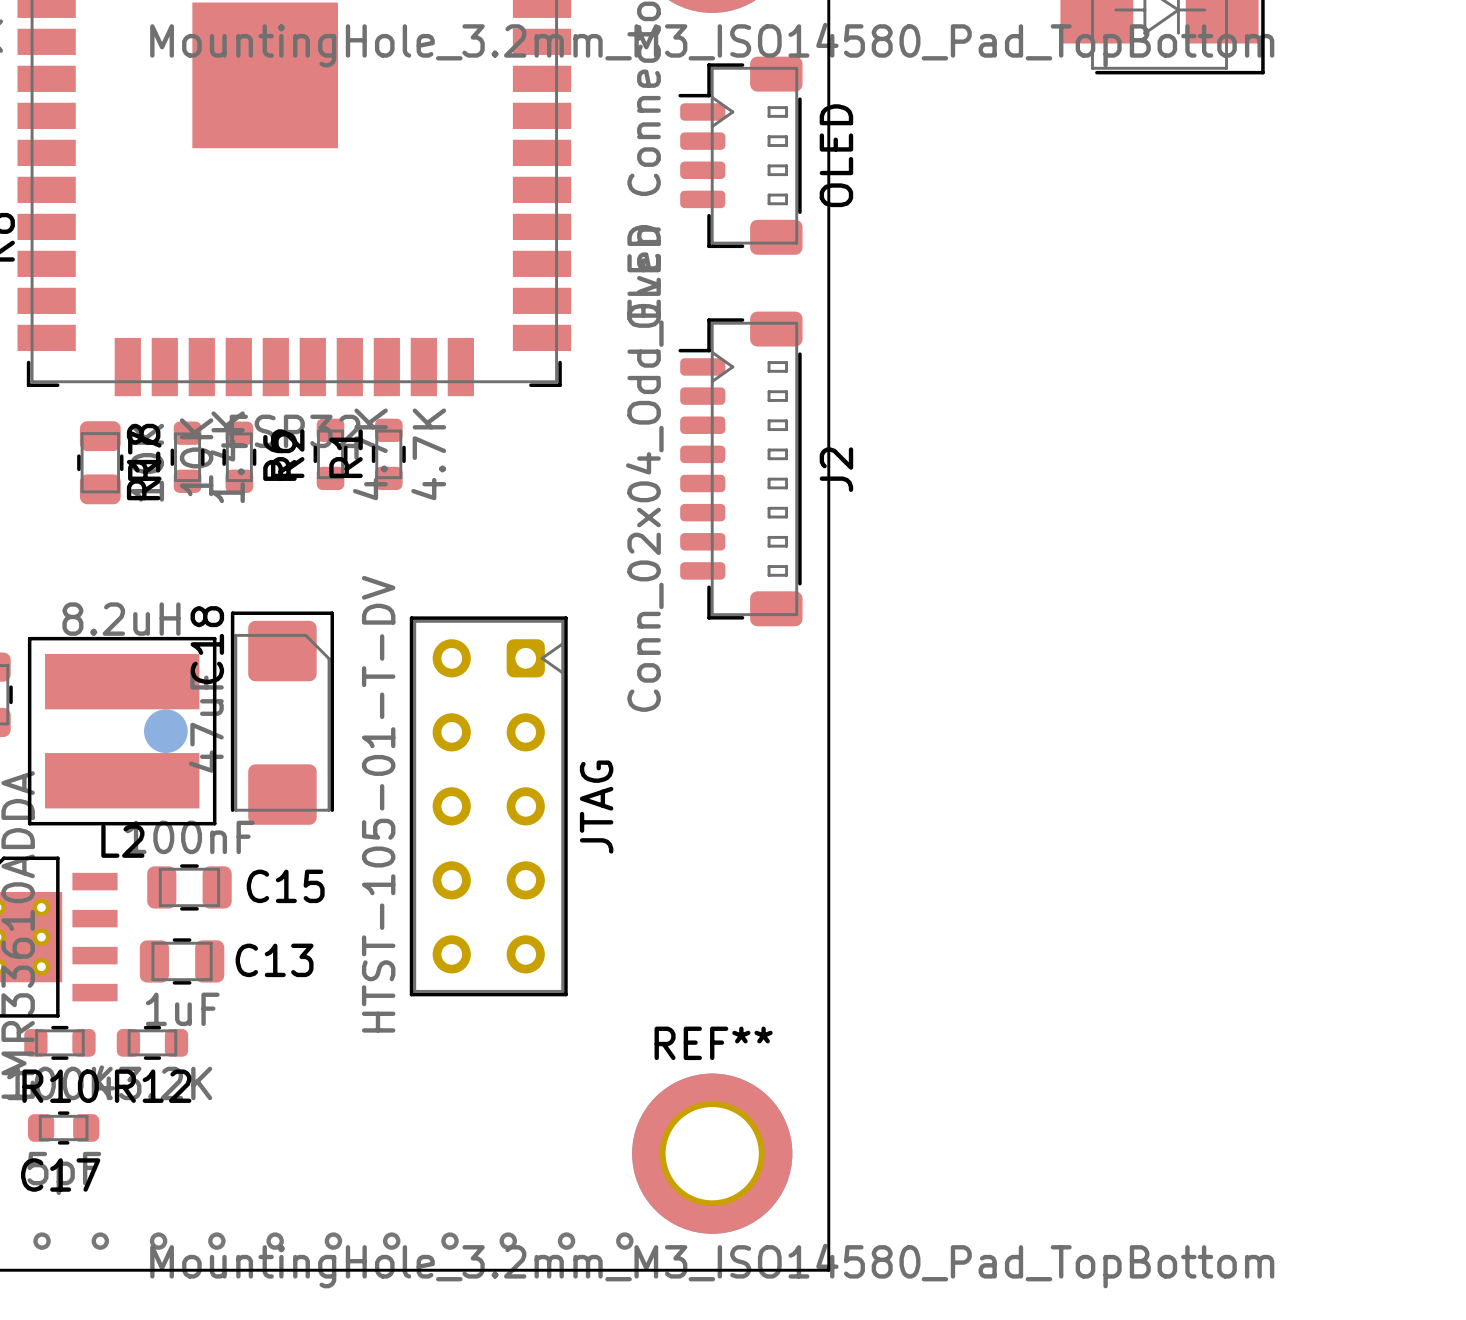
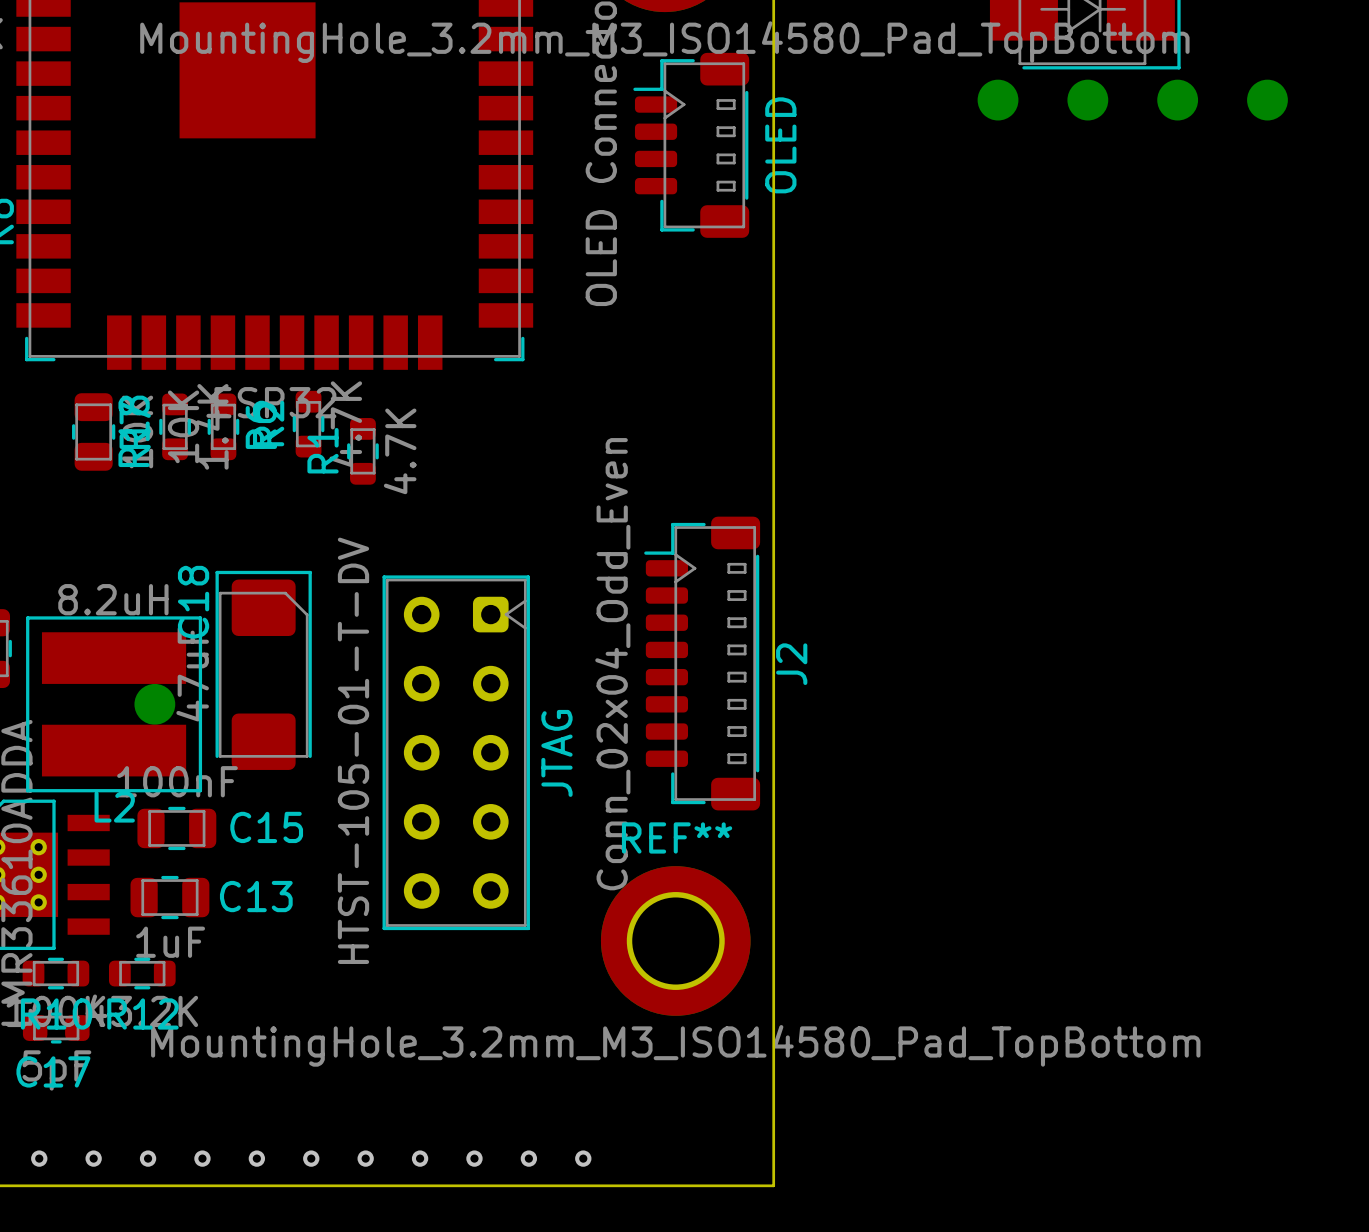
part: none -> (998, 100)
part: none -> (1087, 100)
part: none -> (1177, 100)
part: none -> (1267, 100)
R1 position: (388, 454) -> (362, 451)
J2 position: (740, 468) -> (702, 663)
L2 position: (122, 731) -> (114, 704)
part position: (165, 731) -> (154, 704)
C17 position: (63, 1127) -> (56, 1028)
REF** position: (712, 1153) -> (675, 940)

